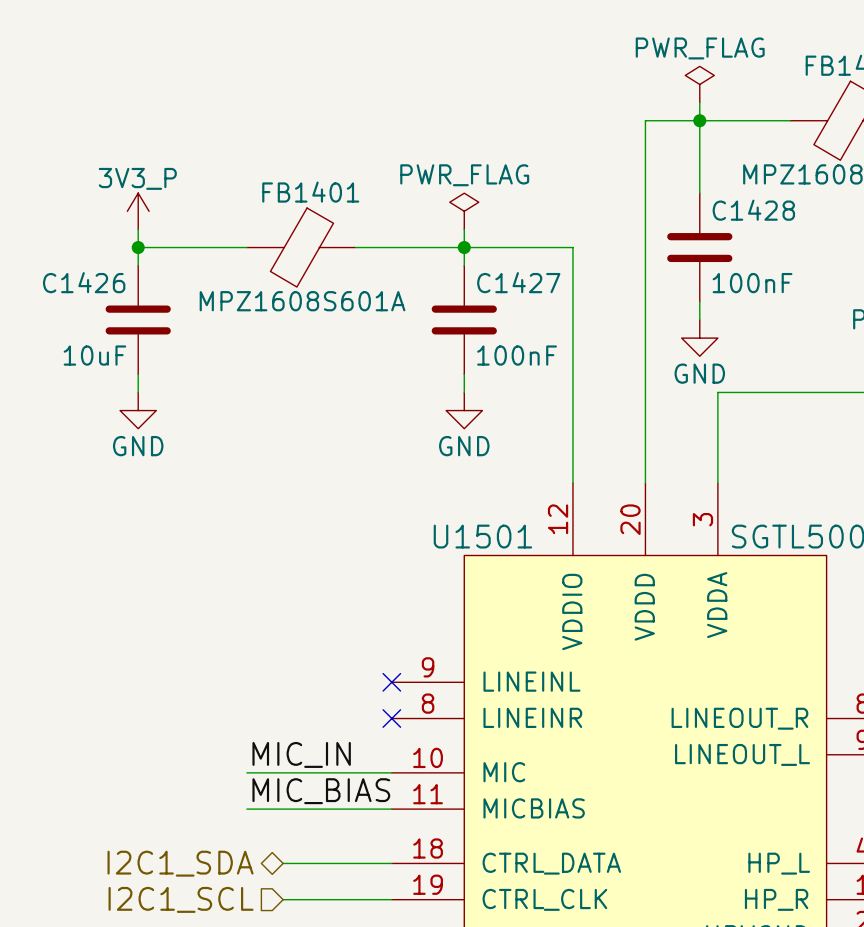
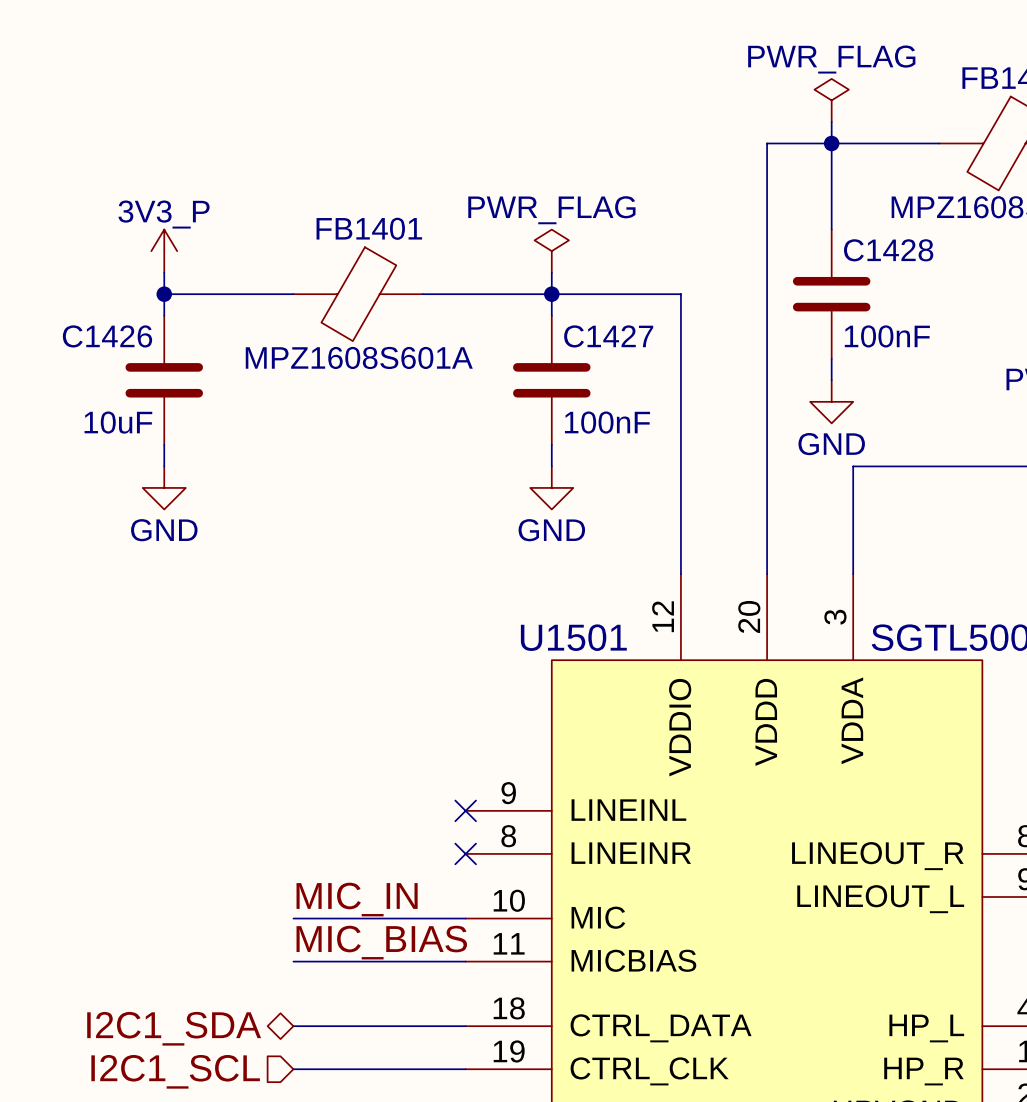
hierarchical label position: I2C1_SDA (180, 863) -> I2C1_SDA (174, 1028)
wire: none -> (293, 1026) (336, 1026)
hierarchical label position: I2C1_SCL (181, 899) -> I2C1_SCL (175, 1071)
wire: none -> (293, 1069) (336, 1069)

